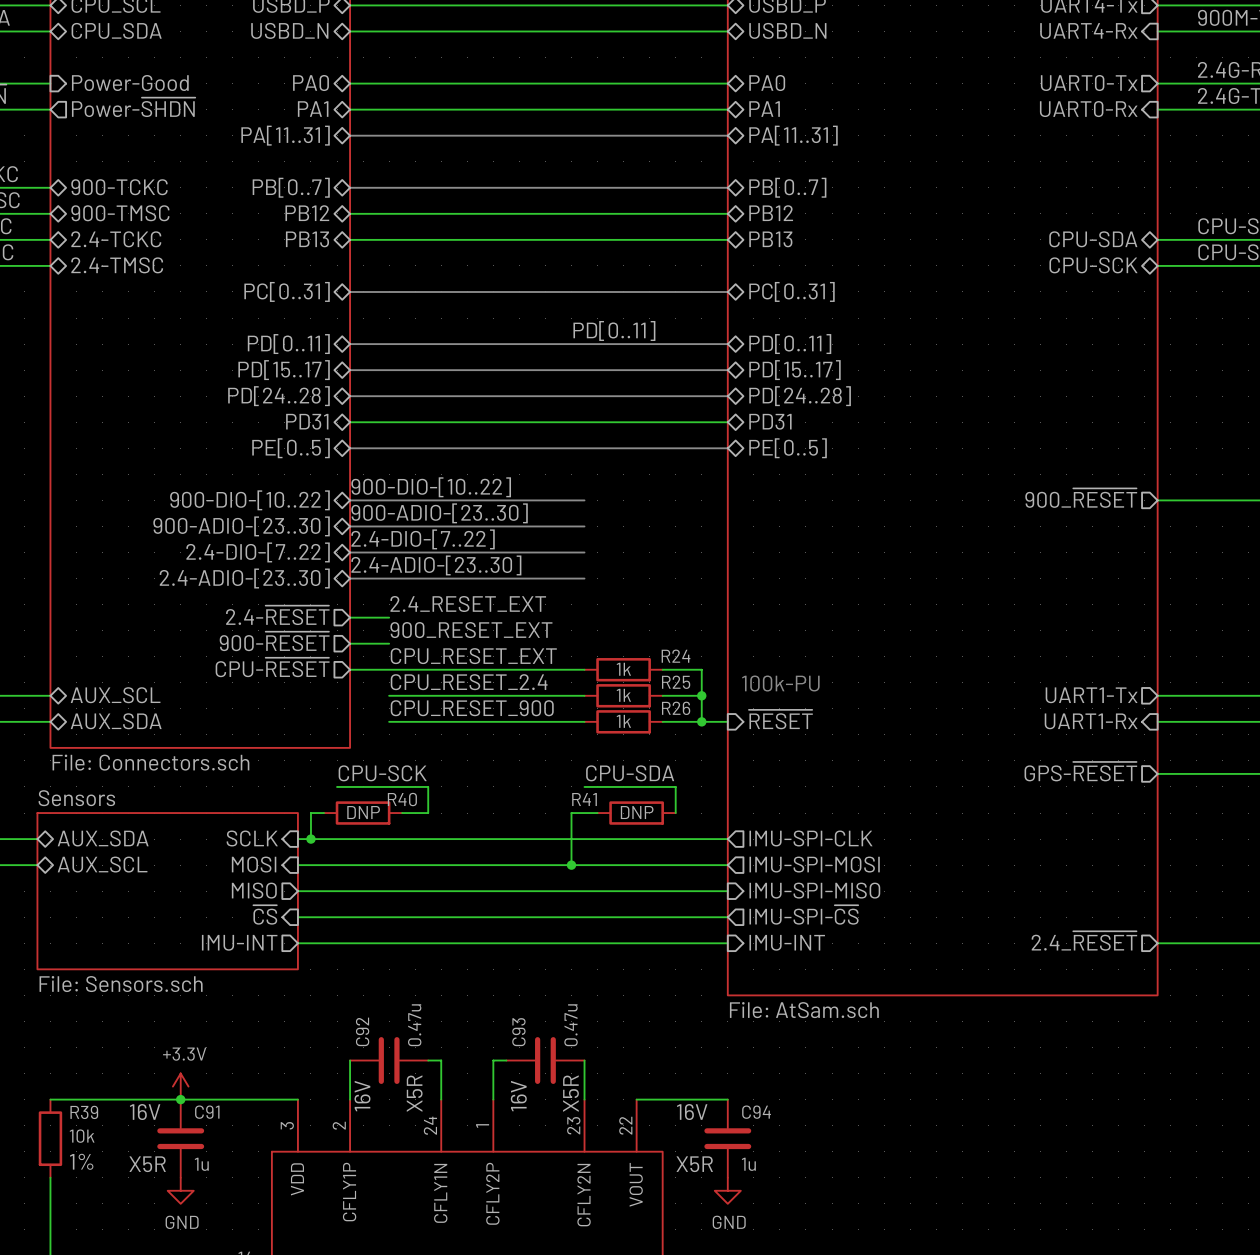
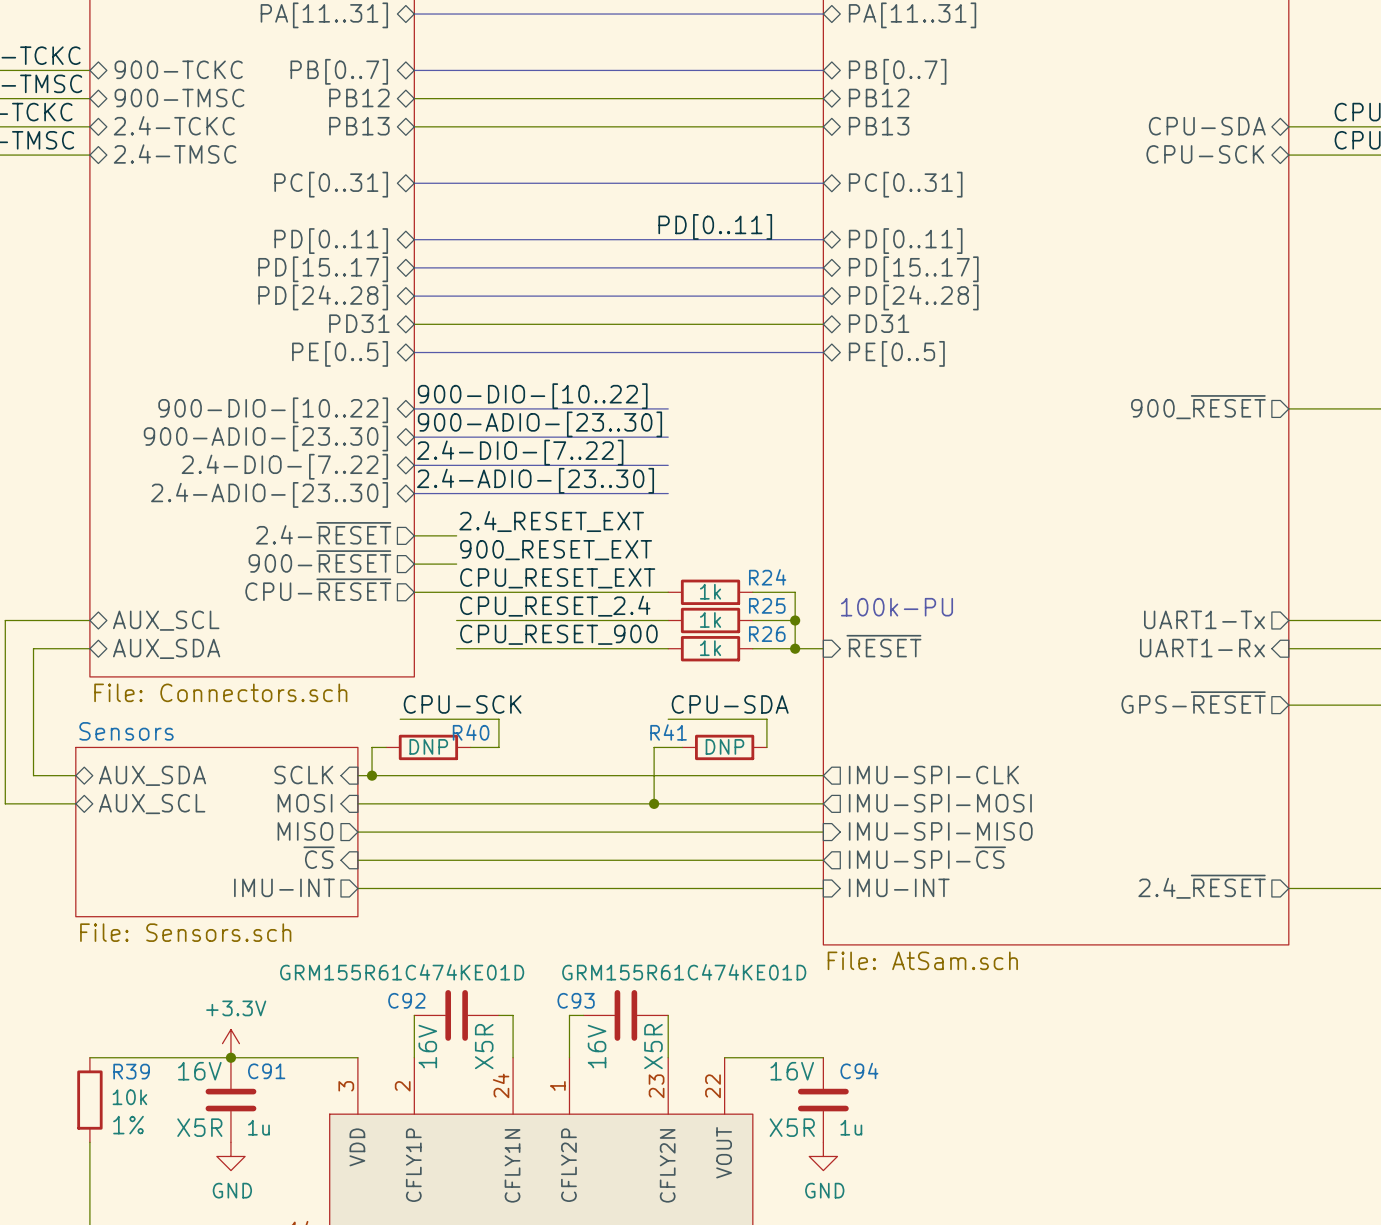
C92 value: 0.47u (414, 1025) -> GRM155R61C474KE01D (402, 972)
C93 value: 0.47u (571, 1025) -> GRM155R61C474KE01D (684, 972)
C92 name rotation: 0° (362, 1031) -> 90° clockwise (406, 1000)
C93 name rotation: 0° (518, 1032) -> 90° clockwise (576, 1000)

